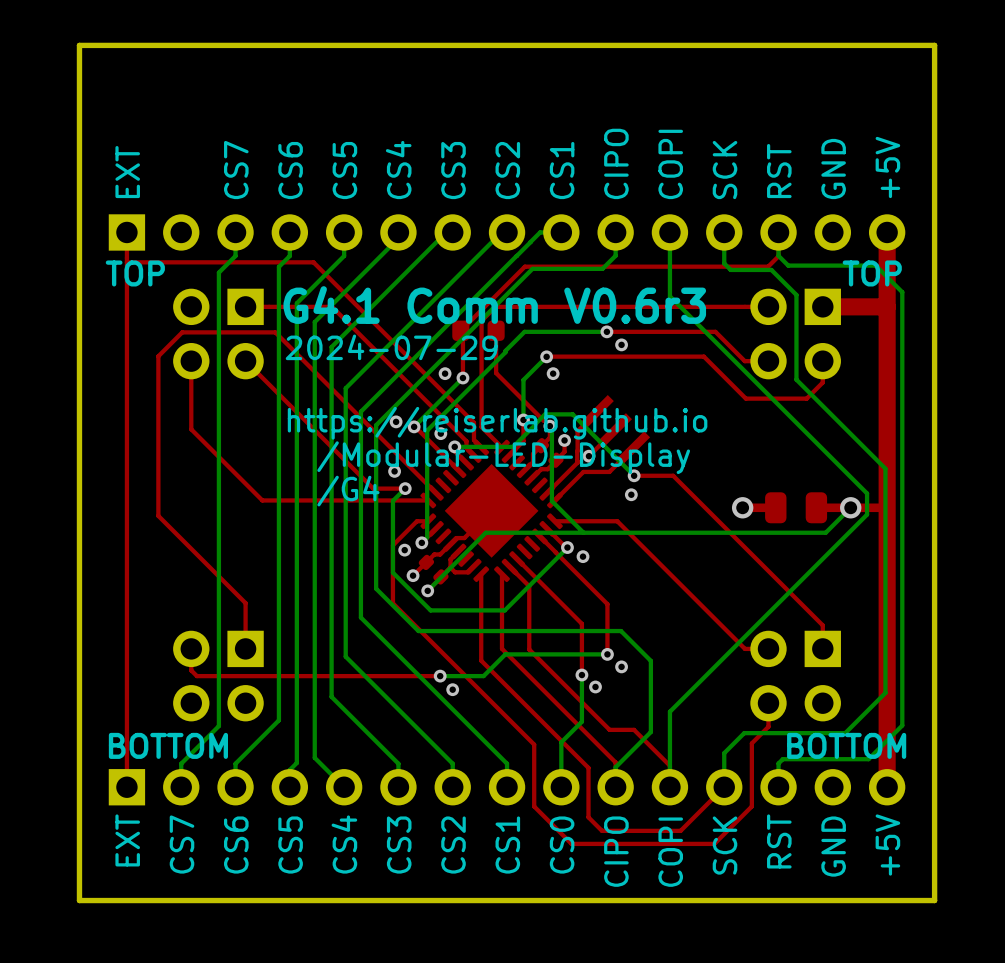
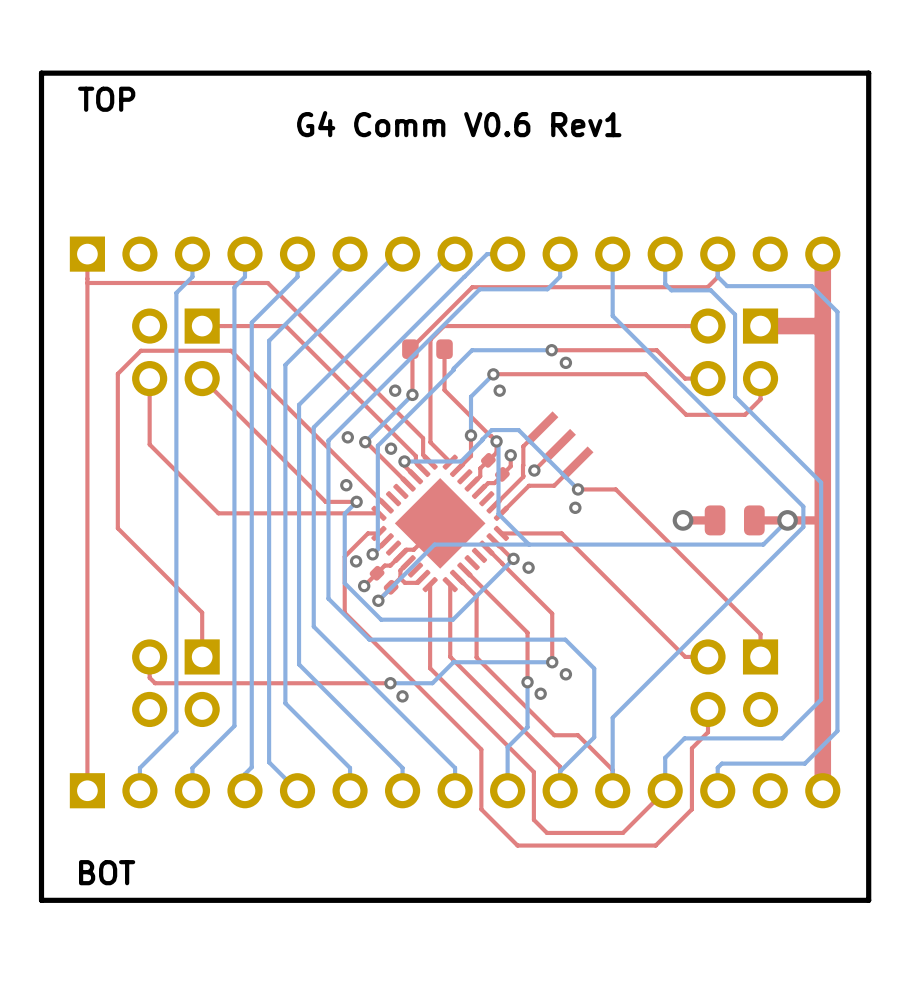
text: none -> G4 Comm V0.6 Rev1 (459, 124)
text: CIPO (616, 163) -> none
text: COPI (670, 164) -> none
text: +5V (887, 167) -> none
text: GND (833, 169) -> none
text: CS7 (236, 170) -> none
text: CS6 (290, 170) -> none
text: CS5 (344, 170) -> none
text: CS4 (398, 170) -> none
text: CS3 (453, 170) -> none
text: CS2 (507, 170) -> none
text: CS1 (562, 170) -> none
text: SCK (725, 170) -> none
text: RST (779, 171) -> none
text: EXT (127, 172) -> none
text position: TOP (135, 273) -> TOP (106, 99)
text: TOP (872, 273) -> none
text: G4.1 Comm V0.6r3 (494, 305) -> none
text: 2024-07-29 (391, 347) -> none
text: https://reiserlab.github.io (497, 423) -> none
text: /Modular-LED-Display (503, 457) -> none
text: /G4 (348, 491) -> none
text: BOTTOM (168, 745) -> none
text: BOTTOM (846, 745) -> none
text: EXT (127, 840) -> none
text: RST (779, 841) -> none
text: CS7 (182, 844) -> none
text: CS4 (344, 844) -> none
text: CS6 (236, 845) -> none
text: CS5 (290, 845) -> none
text: CS3 (399, 845) -> none
text: CS2 (453, 845) -> none
text: CS1 (507, 845) -> none
text: CS0 (562, 845) -> none
text: SCK (725, 845) -> none
text: +5V (887, 845) -> none
text: GND (833, 846) -> none
text: CIPO (616, 851) -> none
text: COPI (670, 852) -> none
text: none -> BOT (107, 872)

